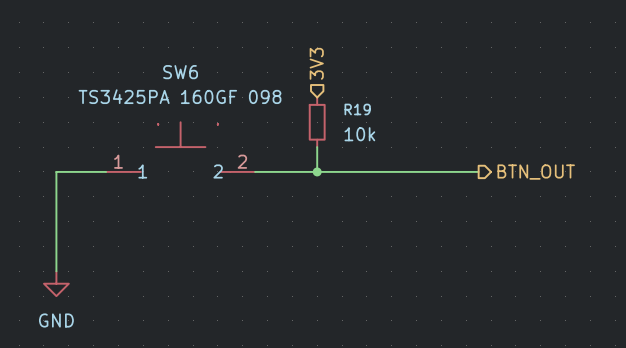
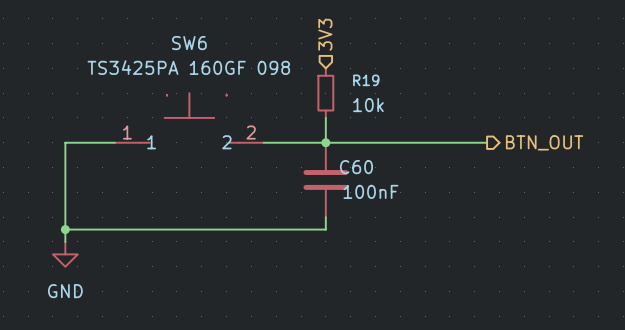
C60: none -> 100nF (325, 179)
wire: none -> (325, 217) (325, 229) (65, 229)
junction: none -> (65, 229)

